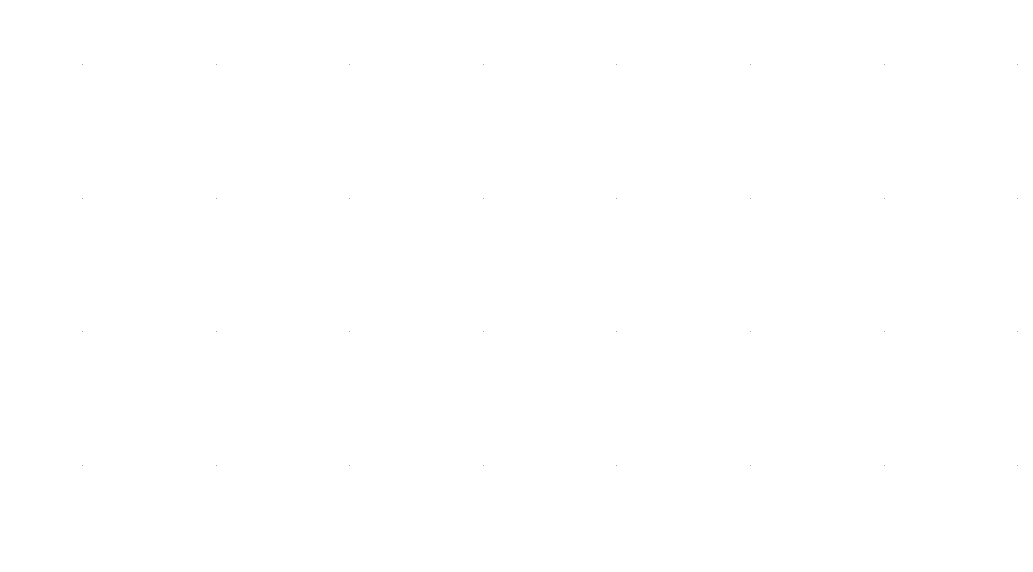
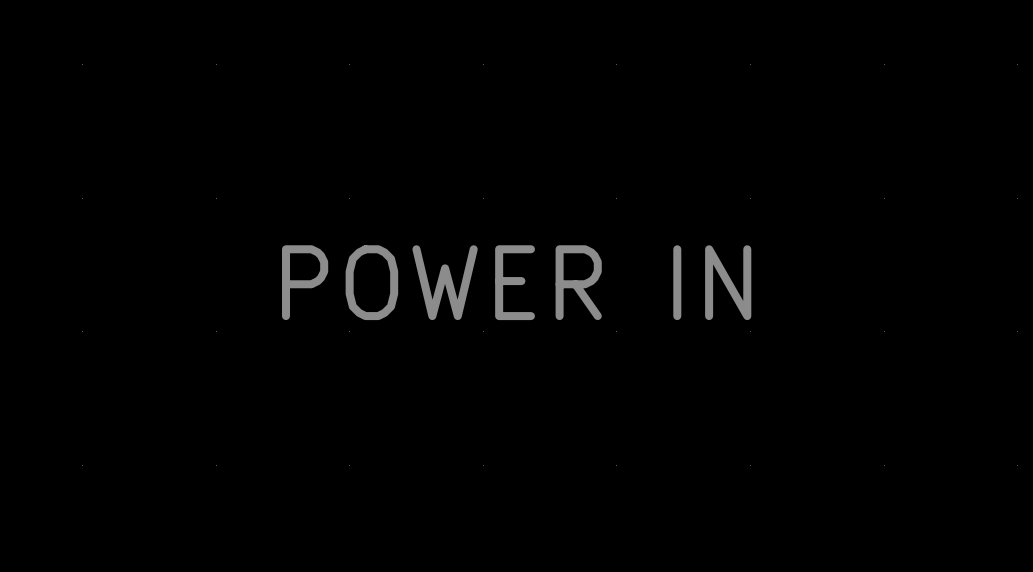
text: none -> POWER IN (516, 282)

